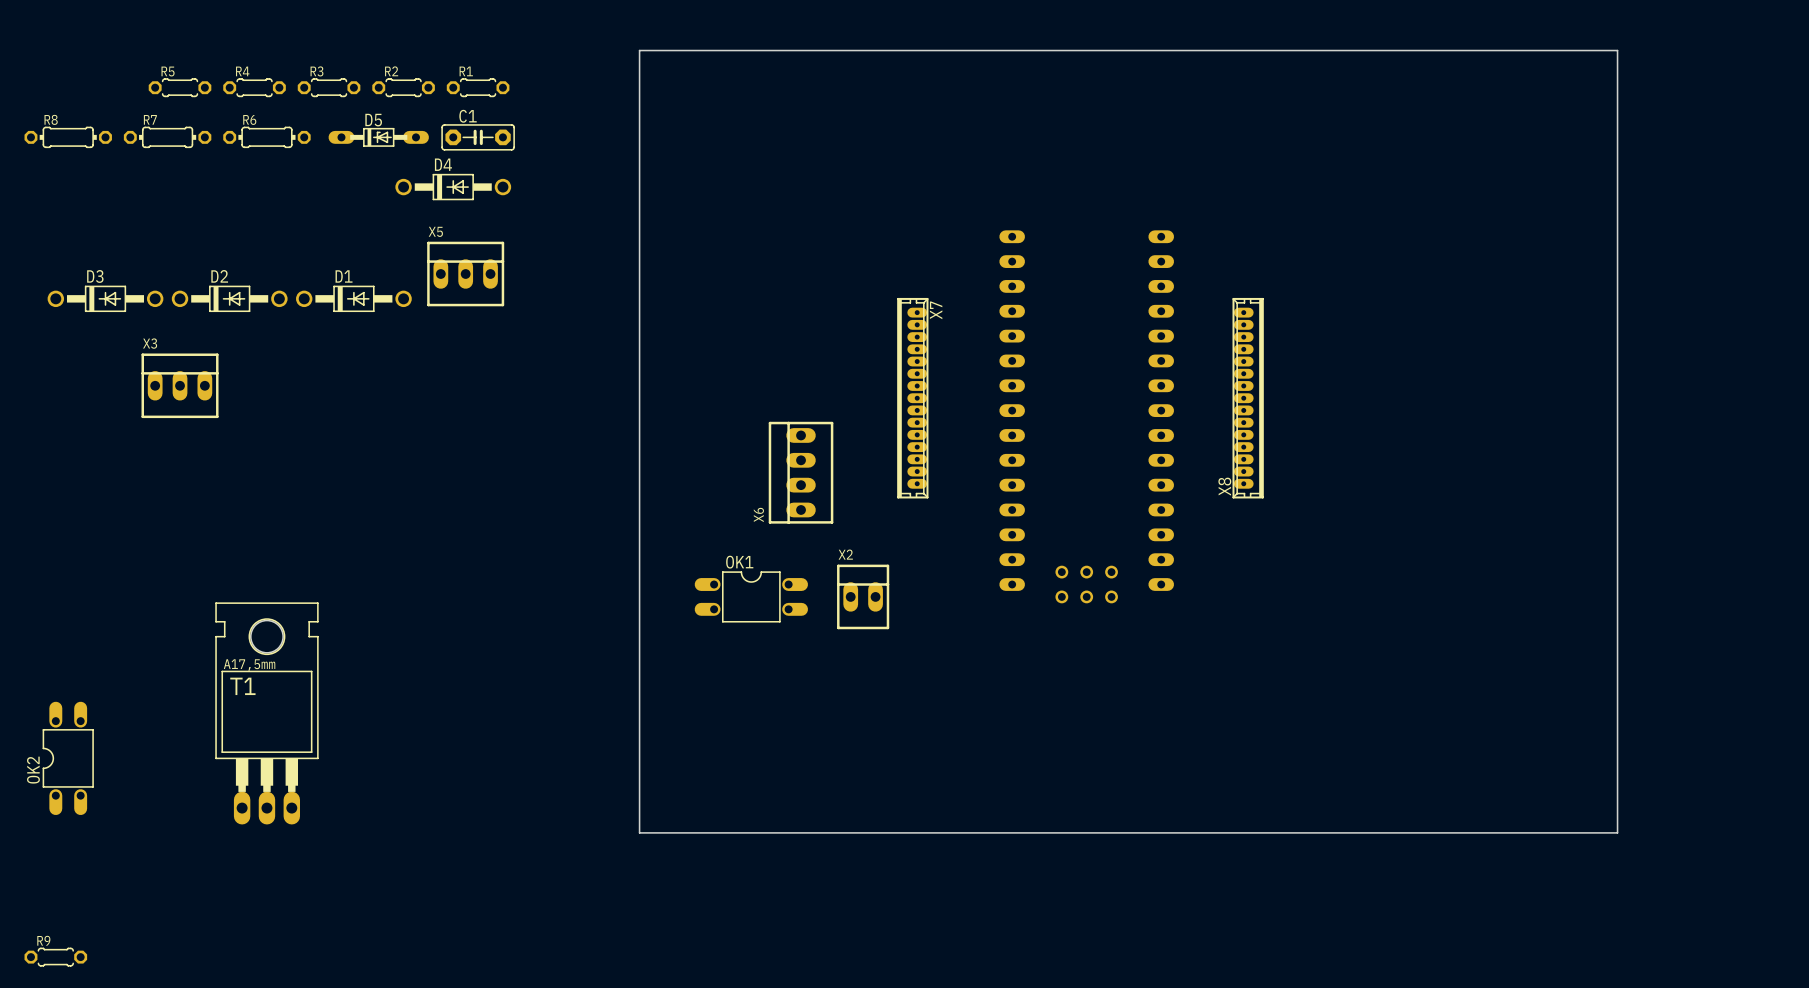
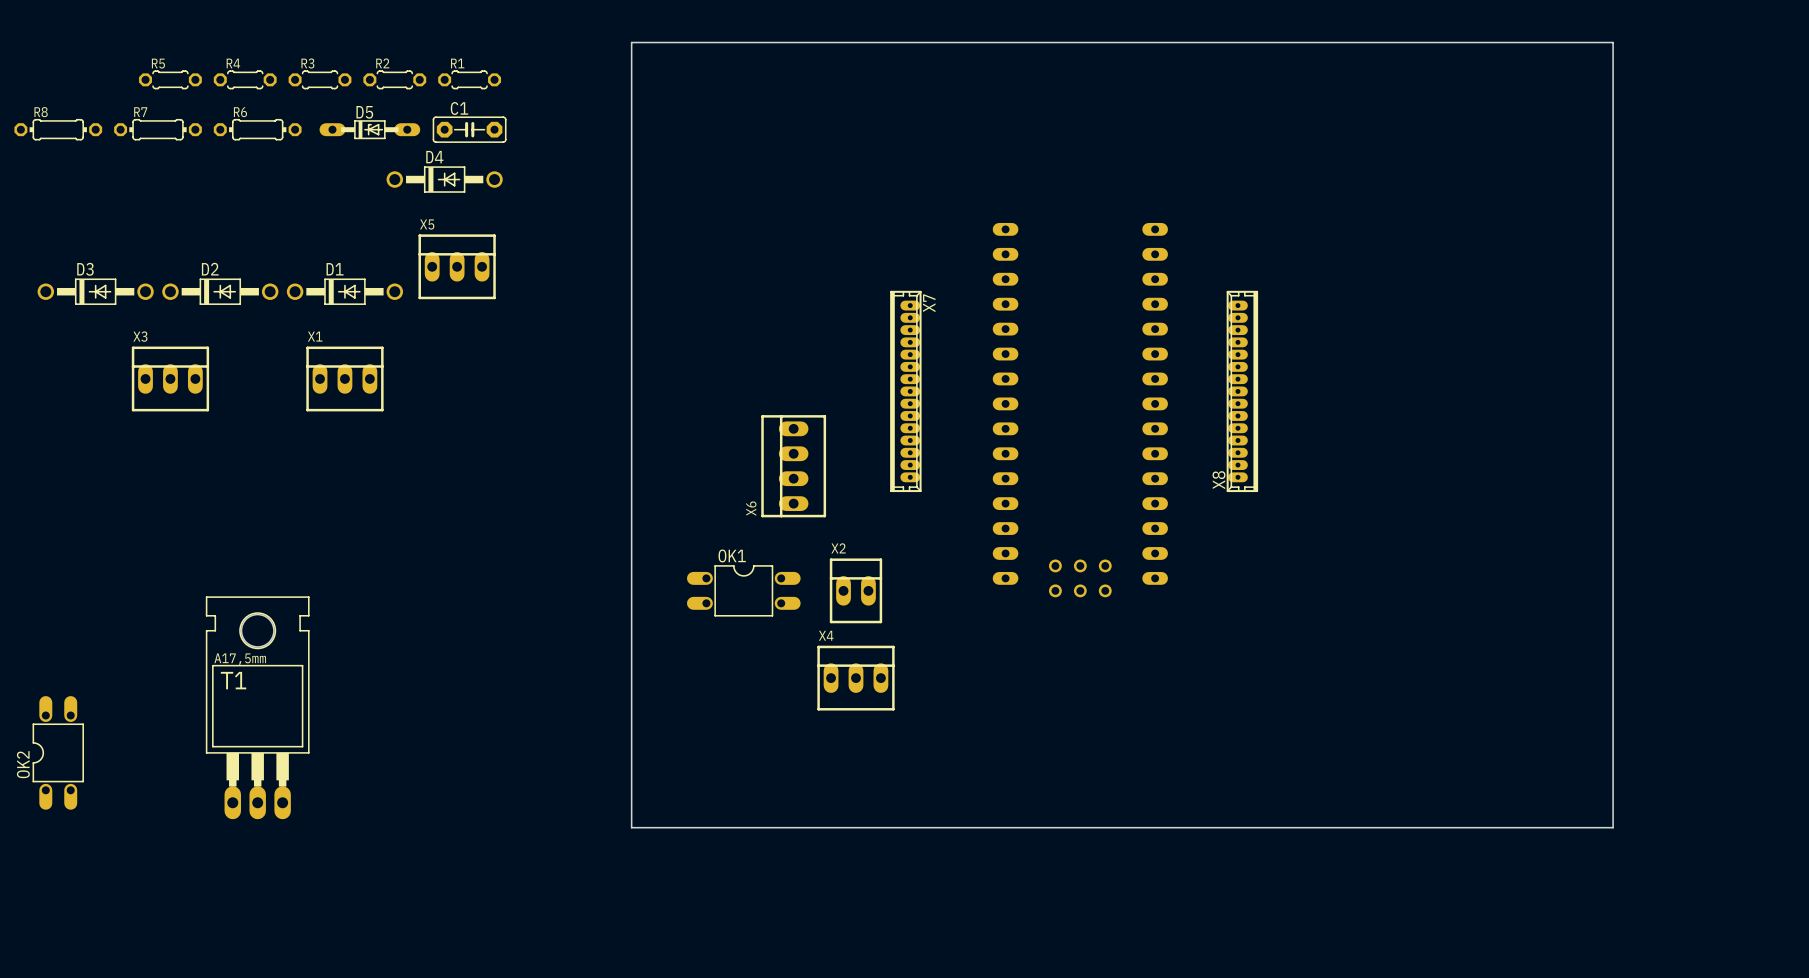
X1: none -> (344, 378)
X4: none -> (855, 678)
R9: (55, 957) -> none

